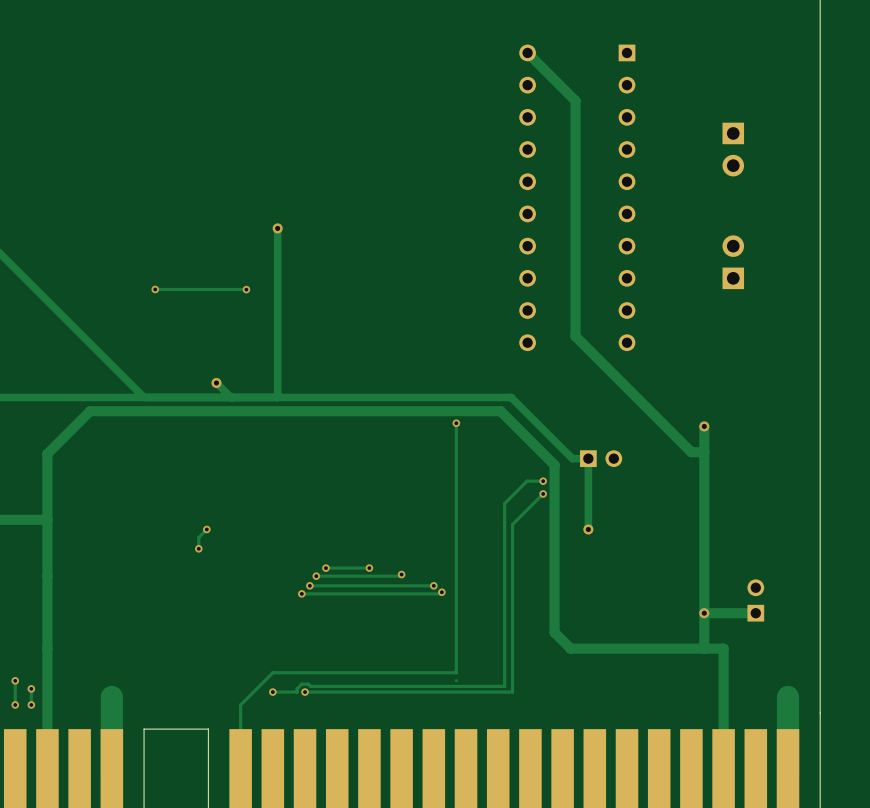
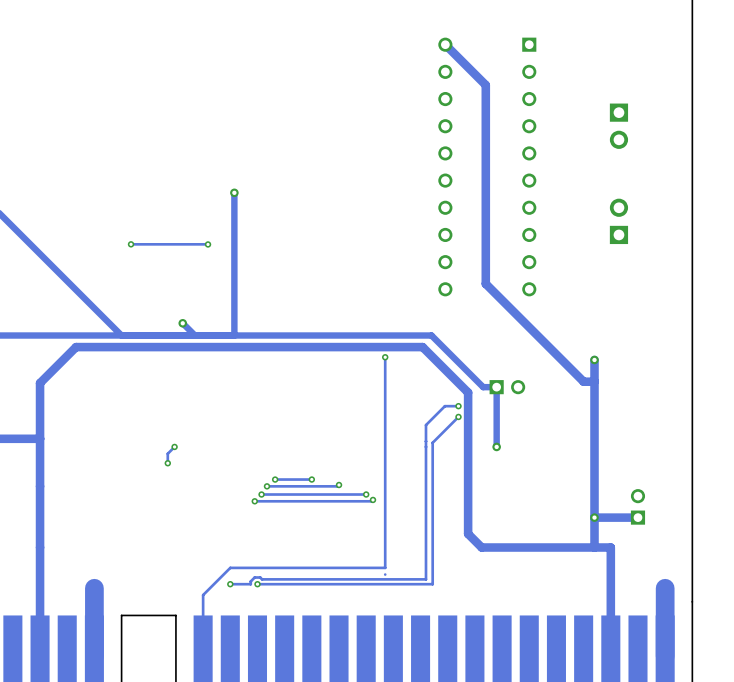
track: (15, 680) (15, 704) -> none
via: (15, 680) -> none
track: (31, 688) (31, 704) -> none
via: (31, 688) -> none
via: (15, 704) -> none
via: (31, 704) -> none

